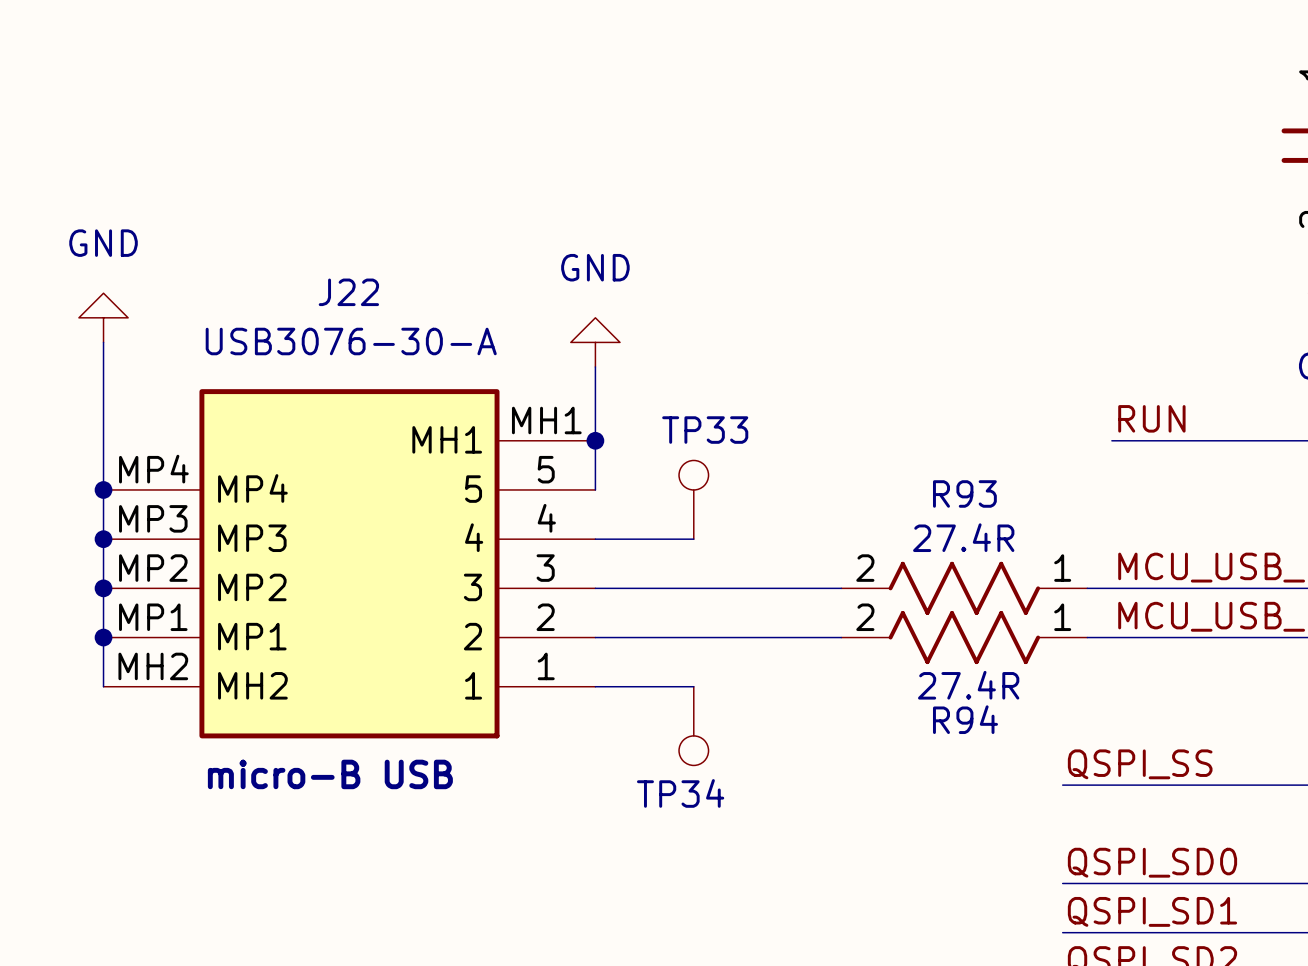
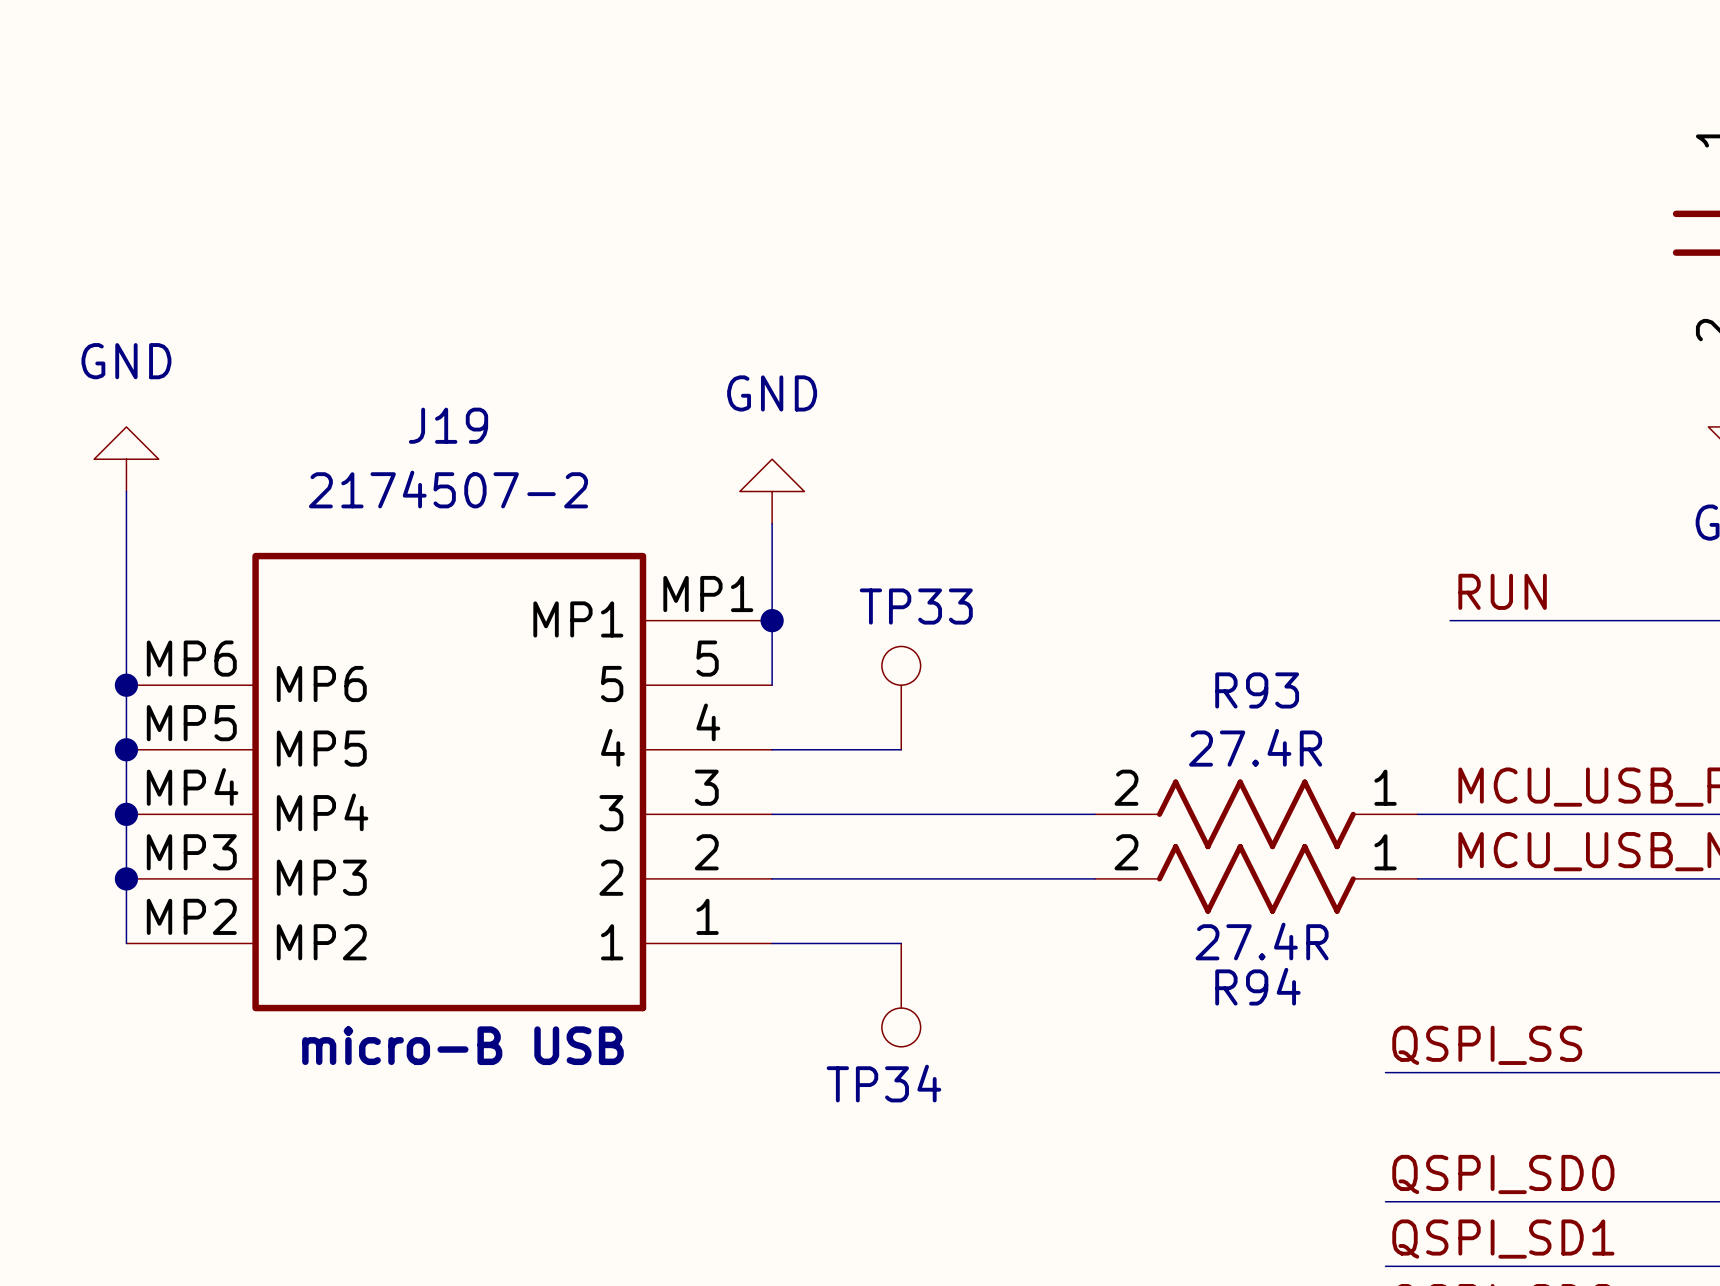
J22: USB3076-30-A (349, 563) -> none
J19: none -> 2174507-2 (449, 782)
text position: micro-B USB (330, 774) -> micro-B USB (462, 1045)

